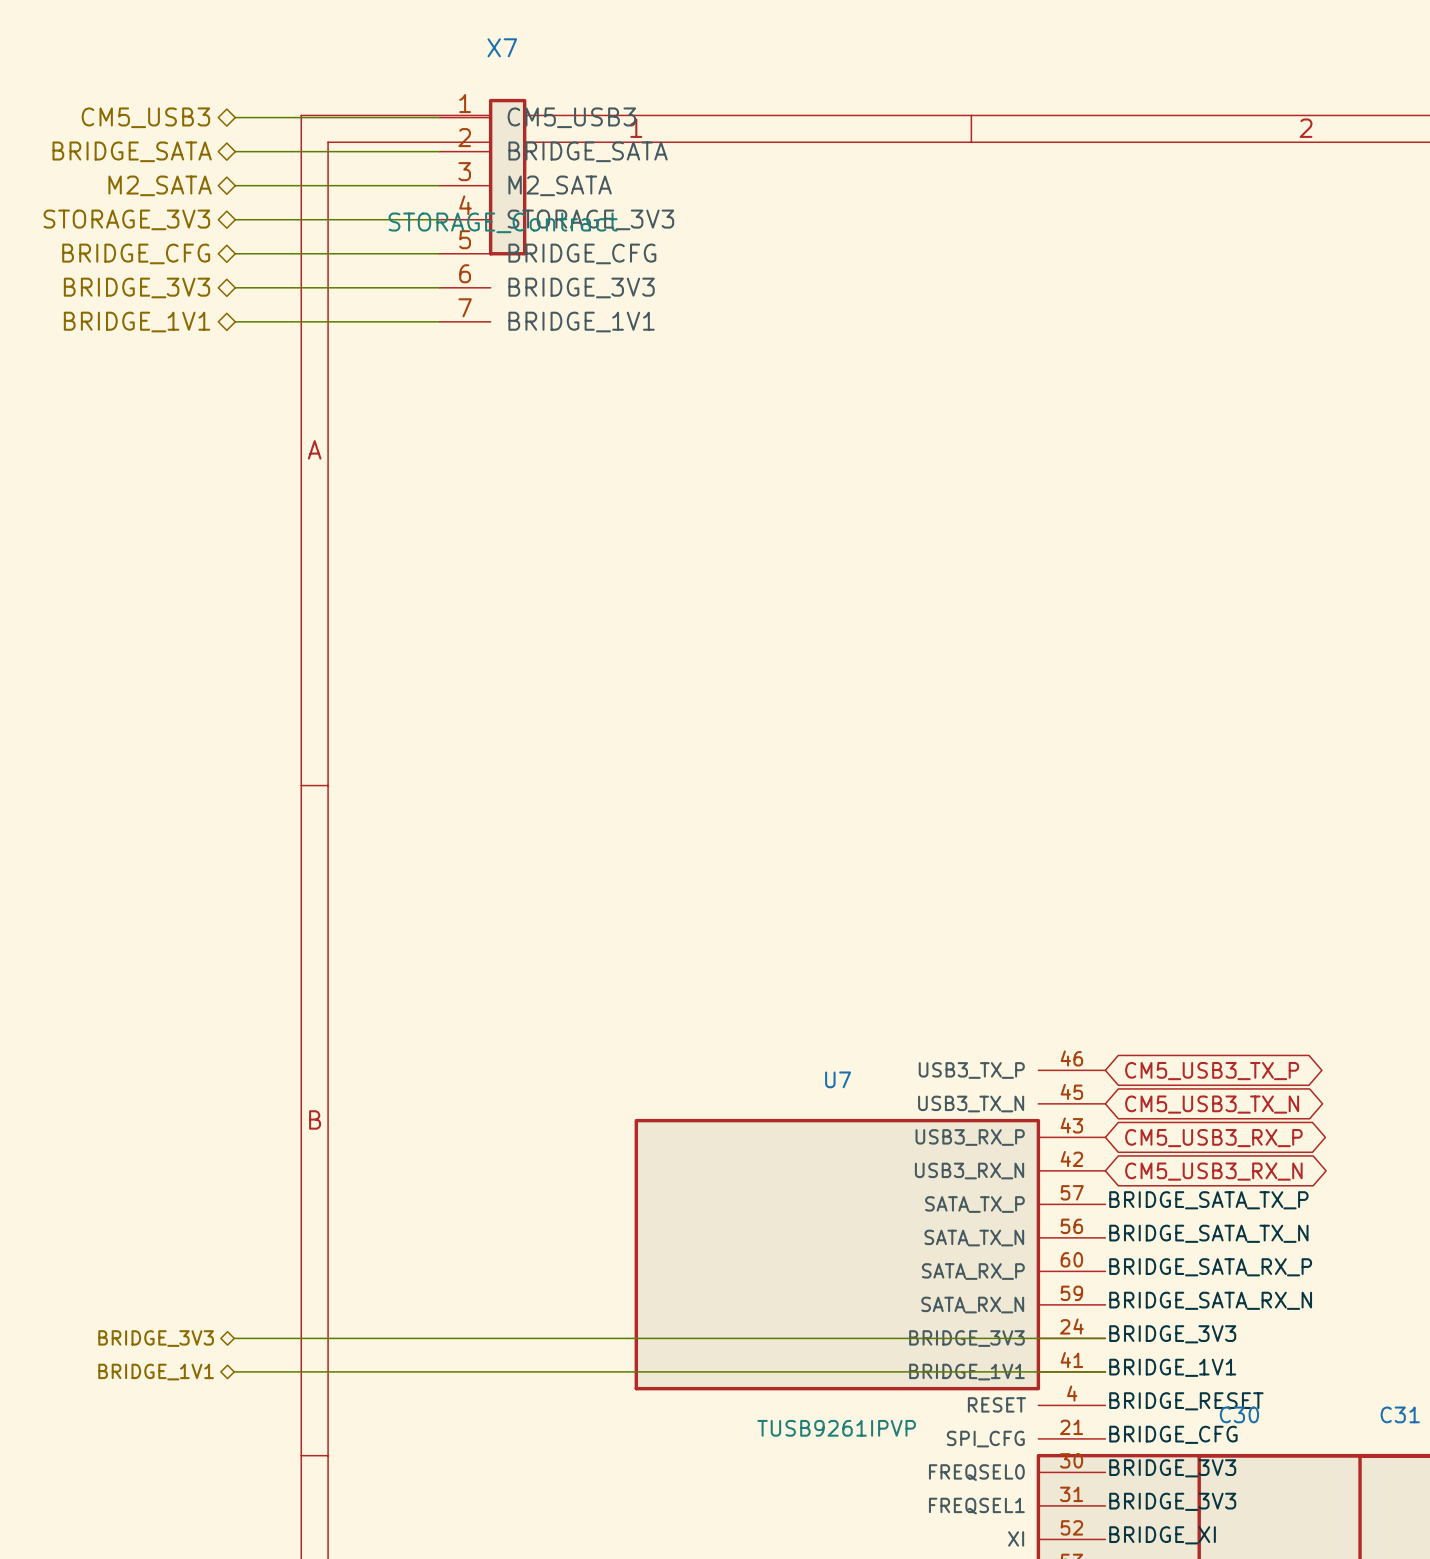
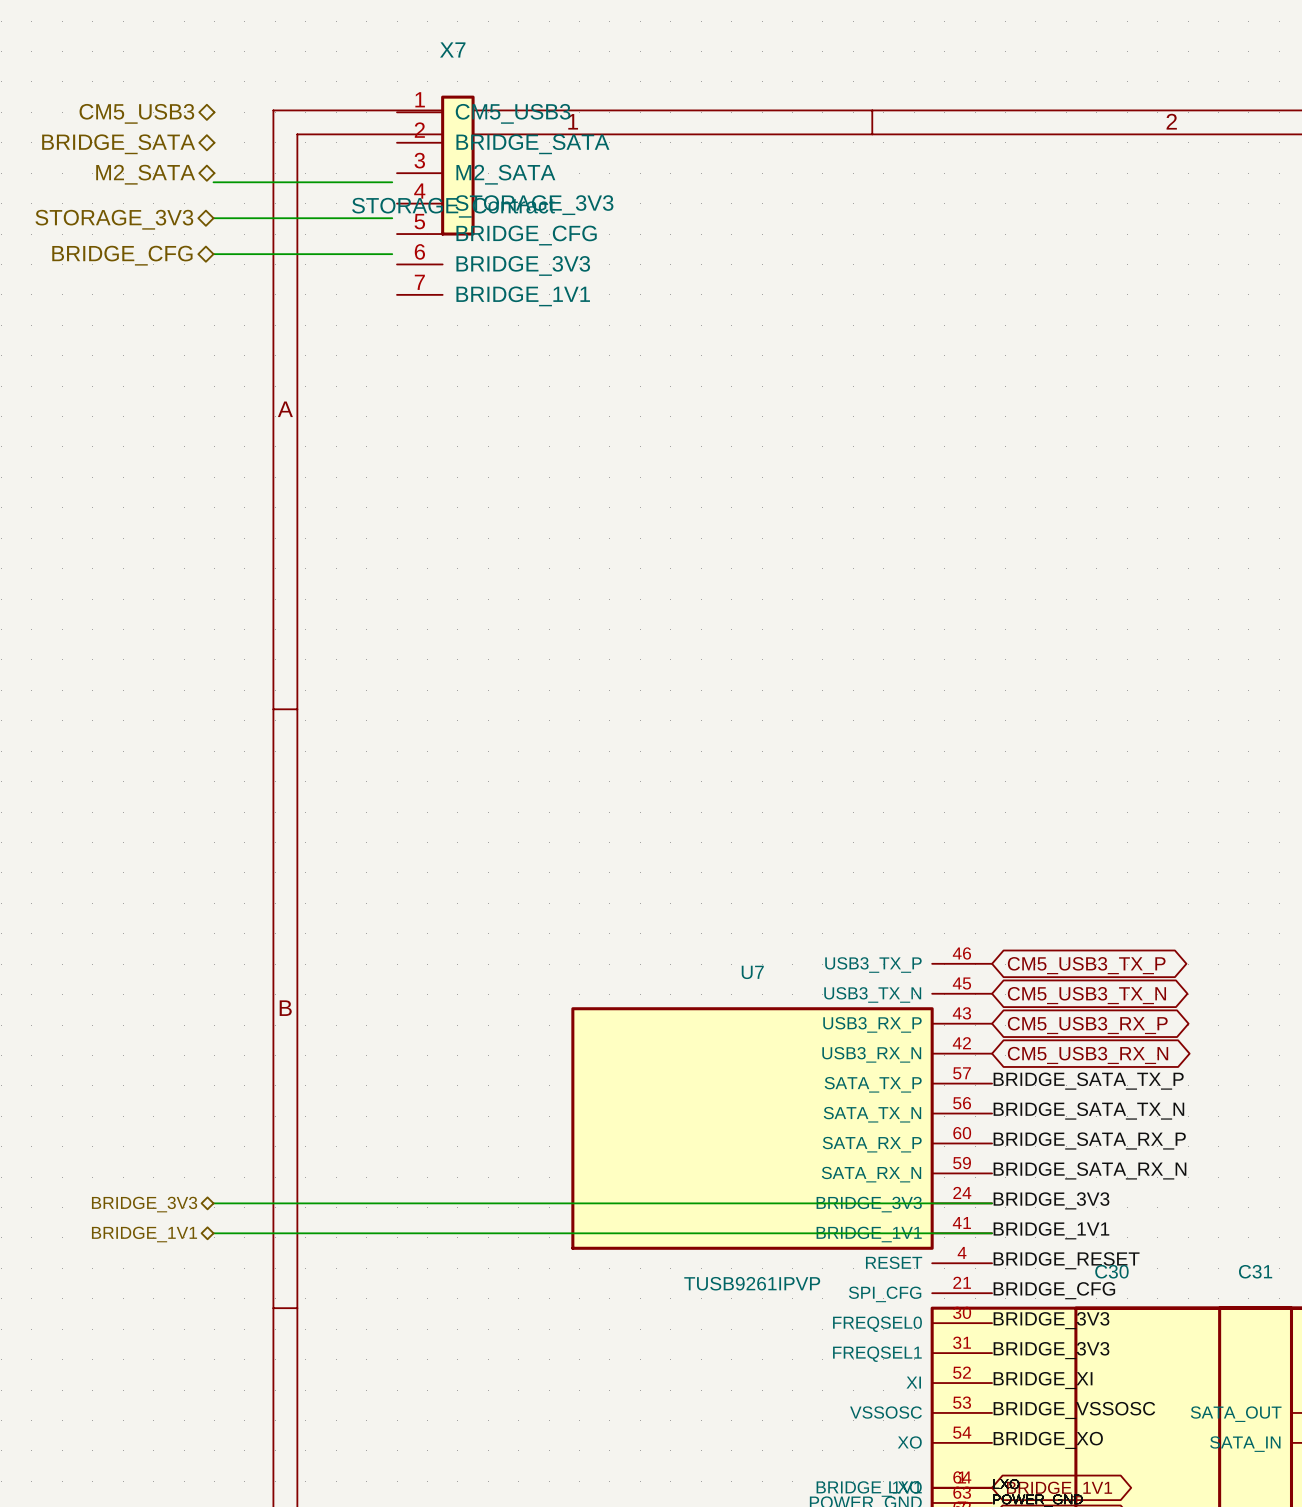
wire: (235, 117) (439, 117) -> none
wire: (235, 151) (439, 151) -> none
wire: (235, 185) (439, 185) -> none
wire: none -> (213, 182) (392, 182)
hierarchical label position: STORAGE_3V3 (126, 219) -> STORAGE_3V3 (114, 219)
wire: (235, 219) (439, 219) -> none
wire: none -> (213, 218) (392, 218)
hierarchical label position: BRIDGE_CFG (136, 253) -> BRIDGE_CFG (122, 255)
wire: (235, 253) (439, 253) -> none
wire: none -> (213, 254) (392, 254)
hierarchical label: BRIDGE_3V3 (136, 287) -> none
wire: (235, 287) (439, 287) -> none
wire: (235, 321) (439, 321) -> none
hierarchical label: BRIDGE_1V1 (136, 322) -> none

